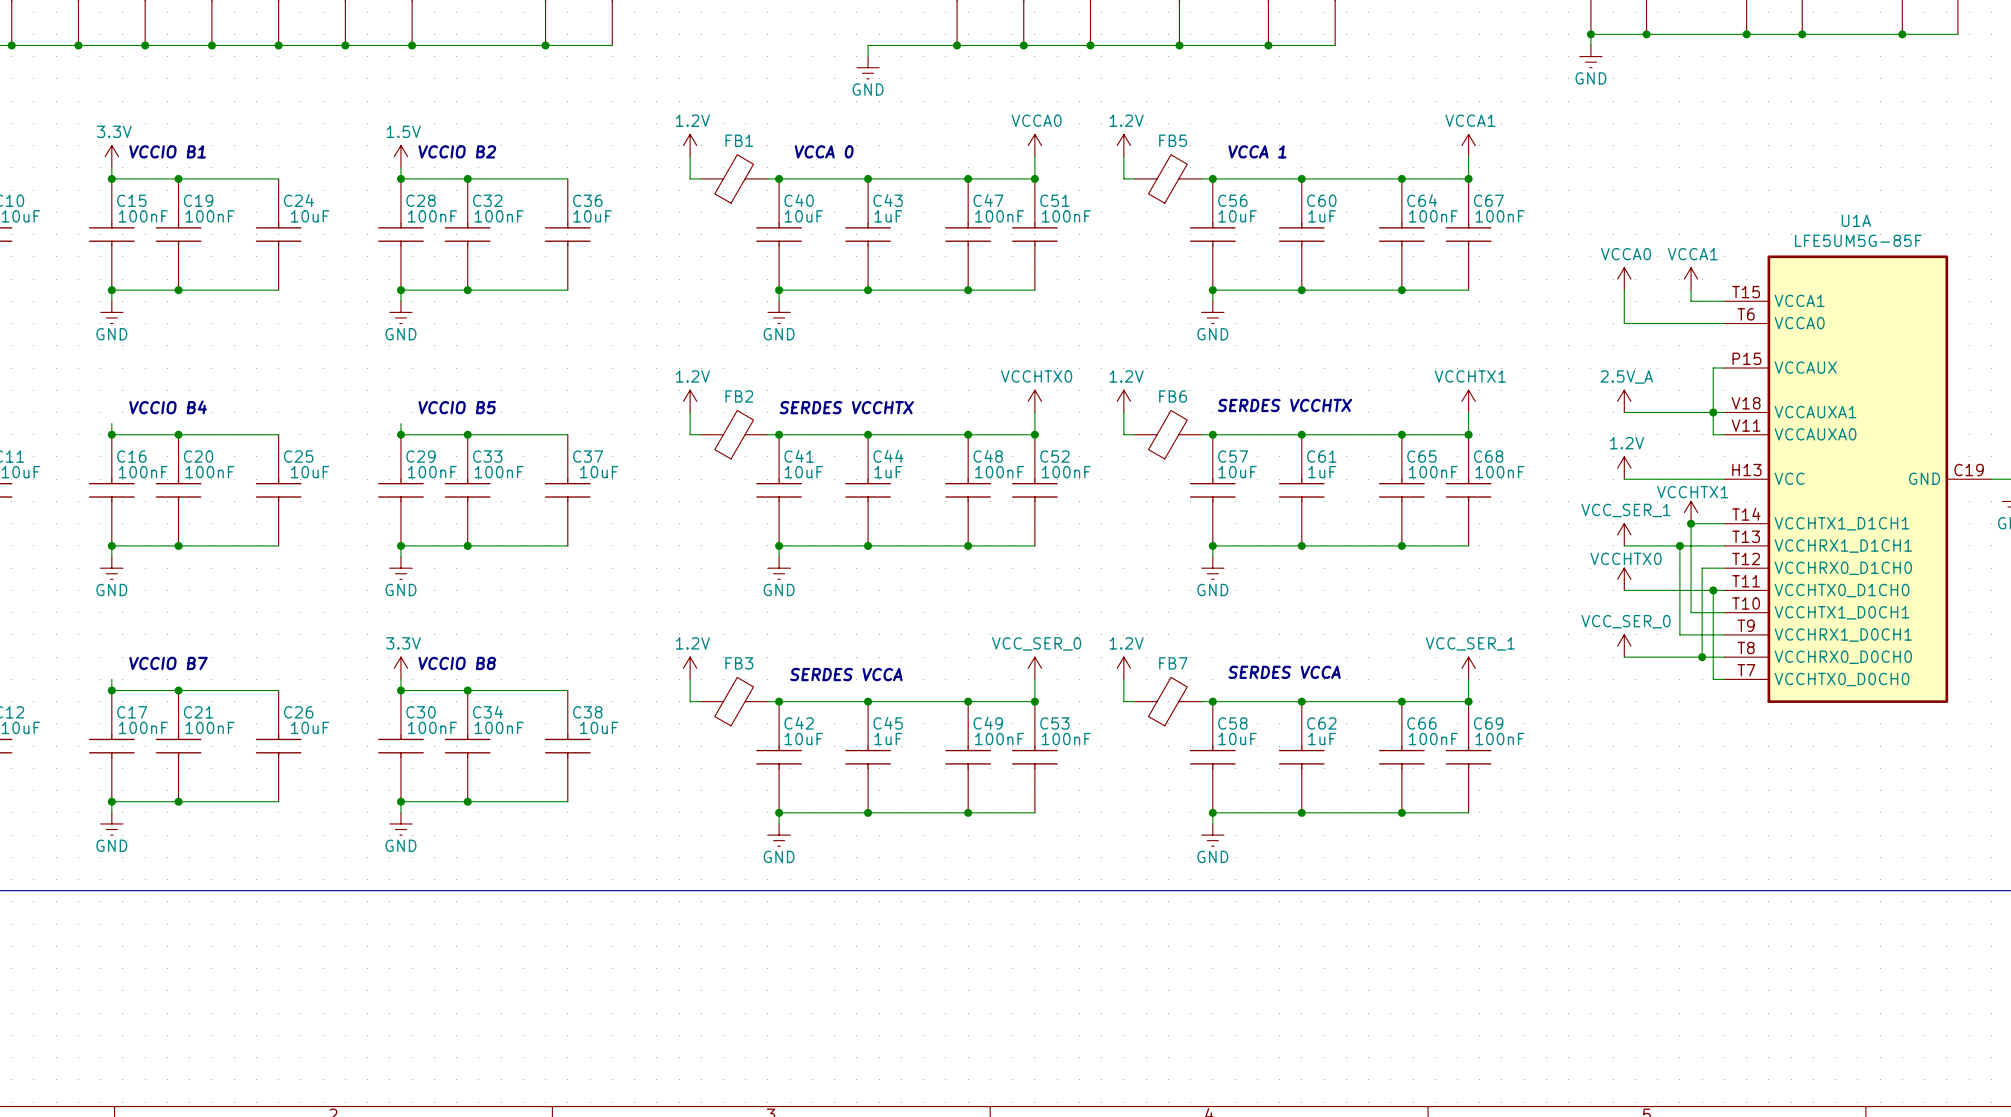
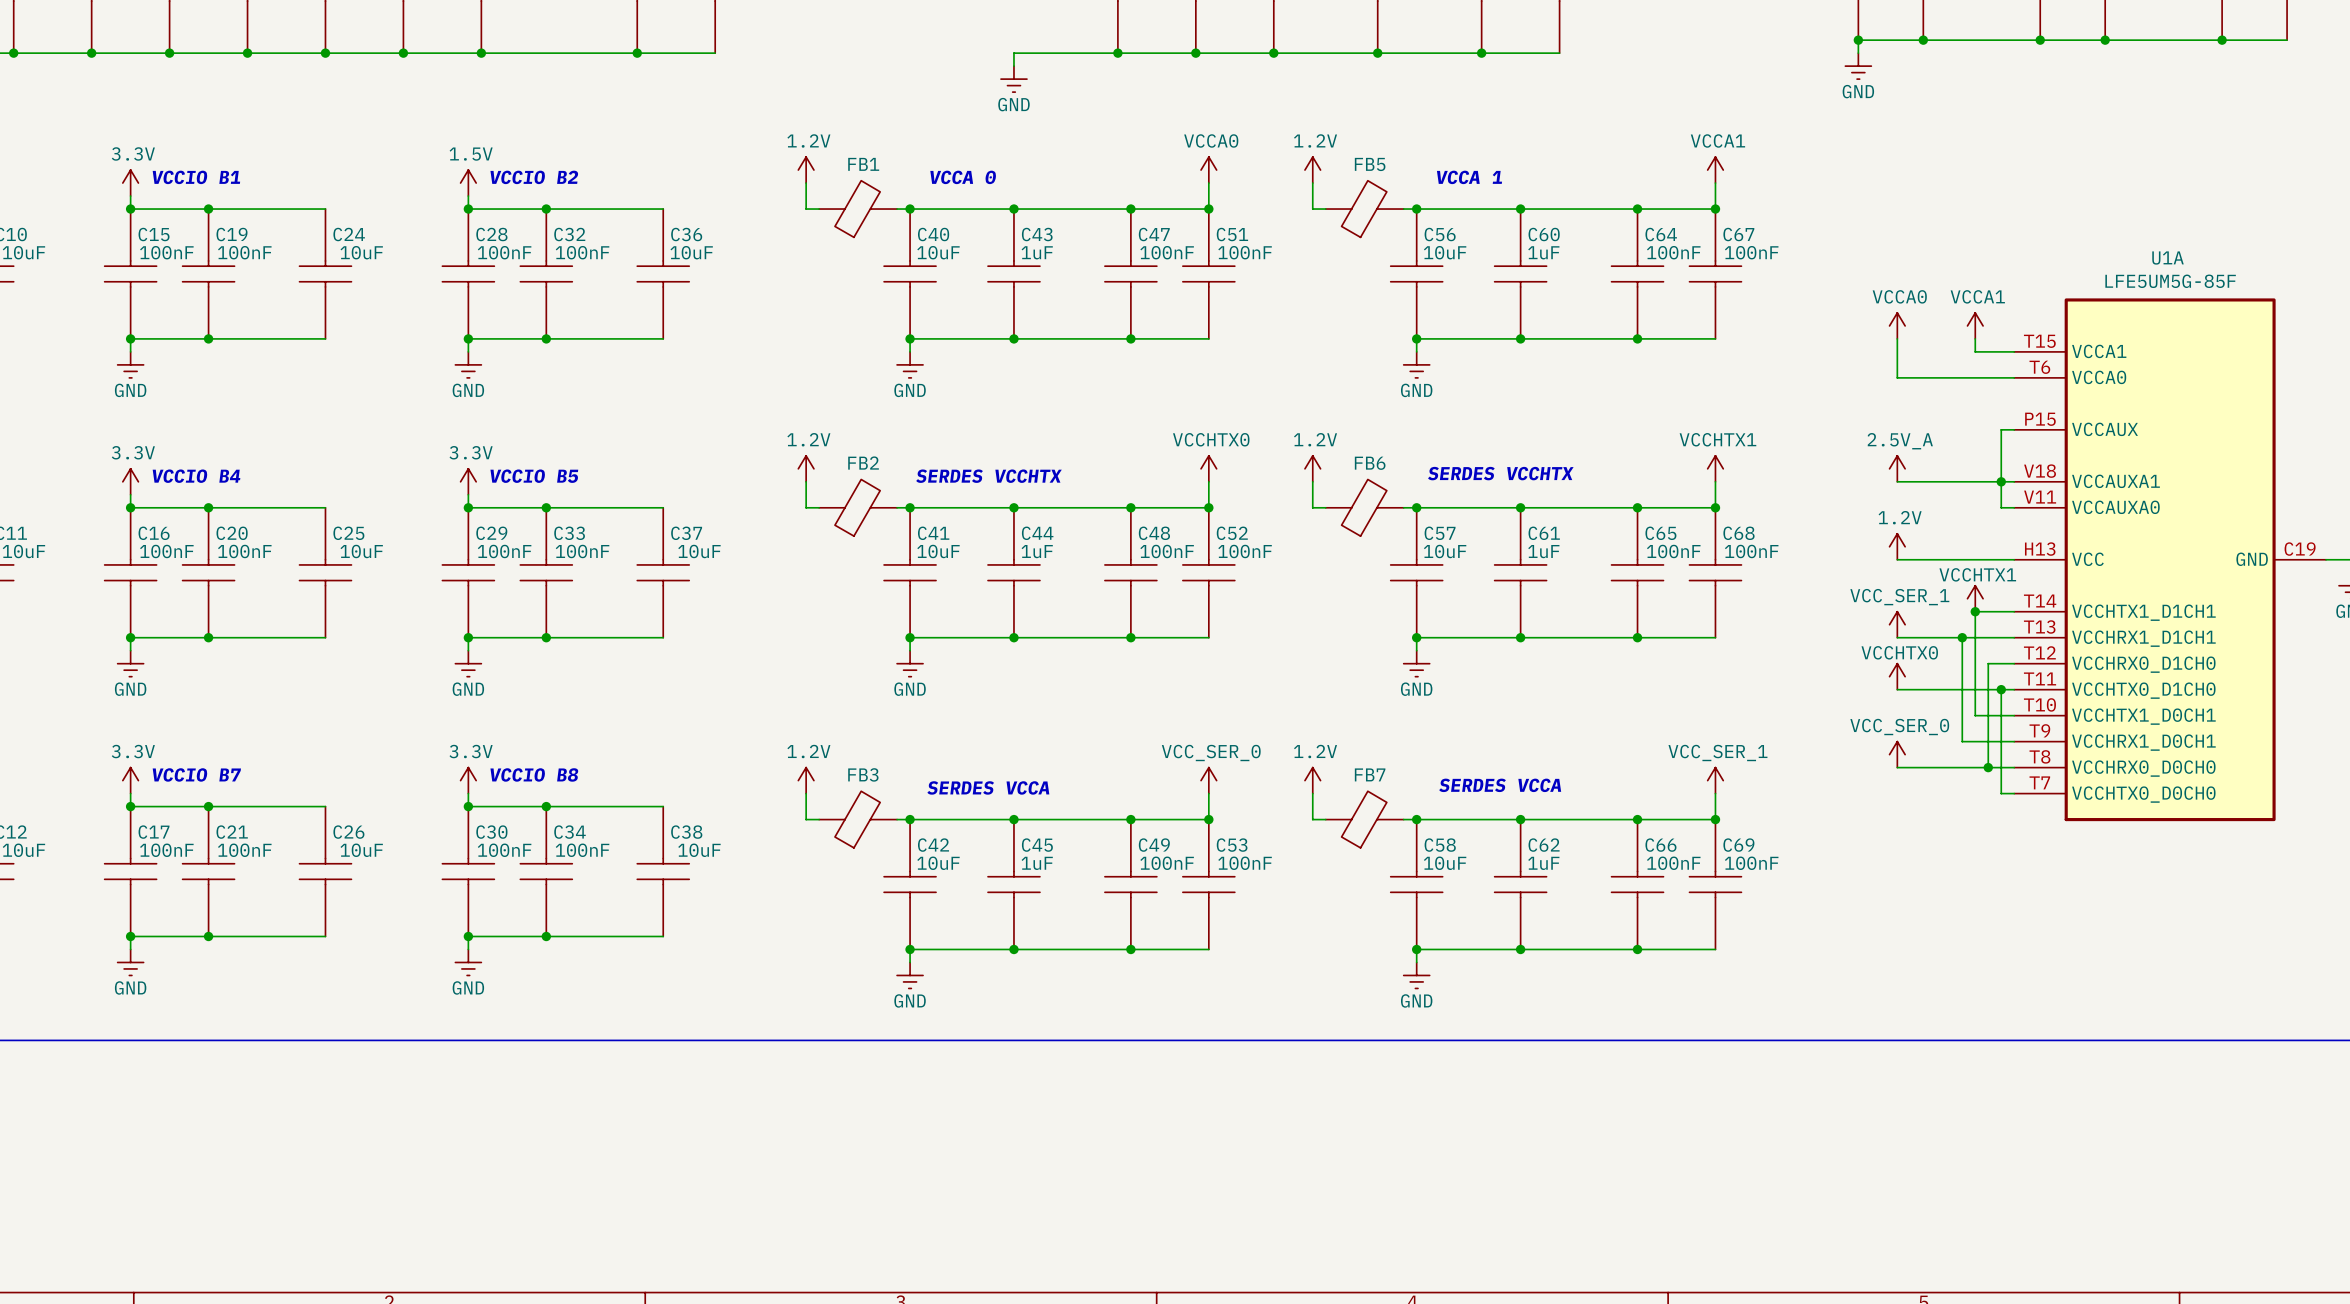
power symbol: none -> 3.3V (130, 481)
power symbol: none -> 3.3V (468, 481)
power symbol: none -> 3.3V (130, 780)

